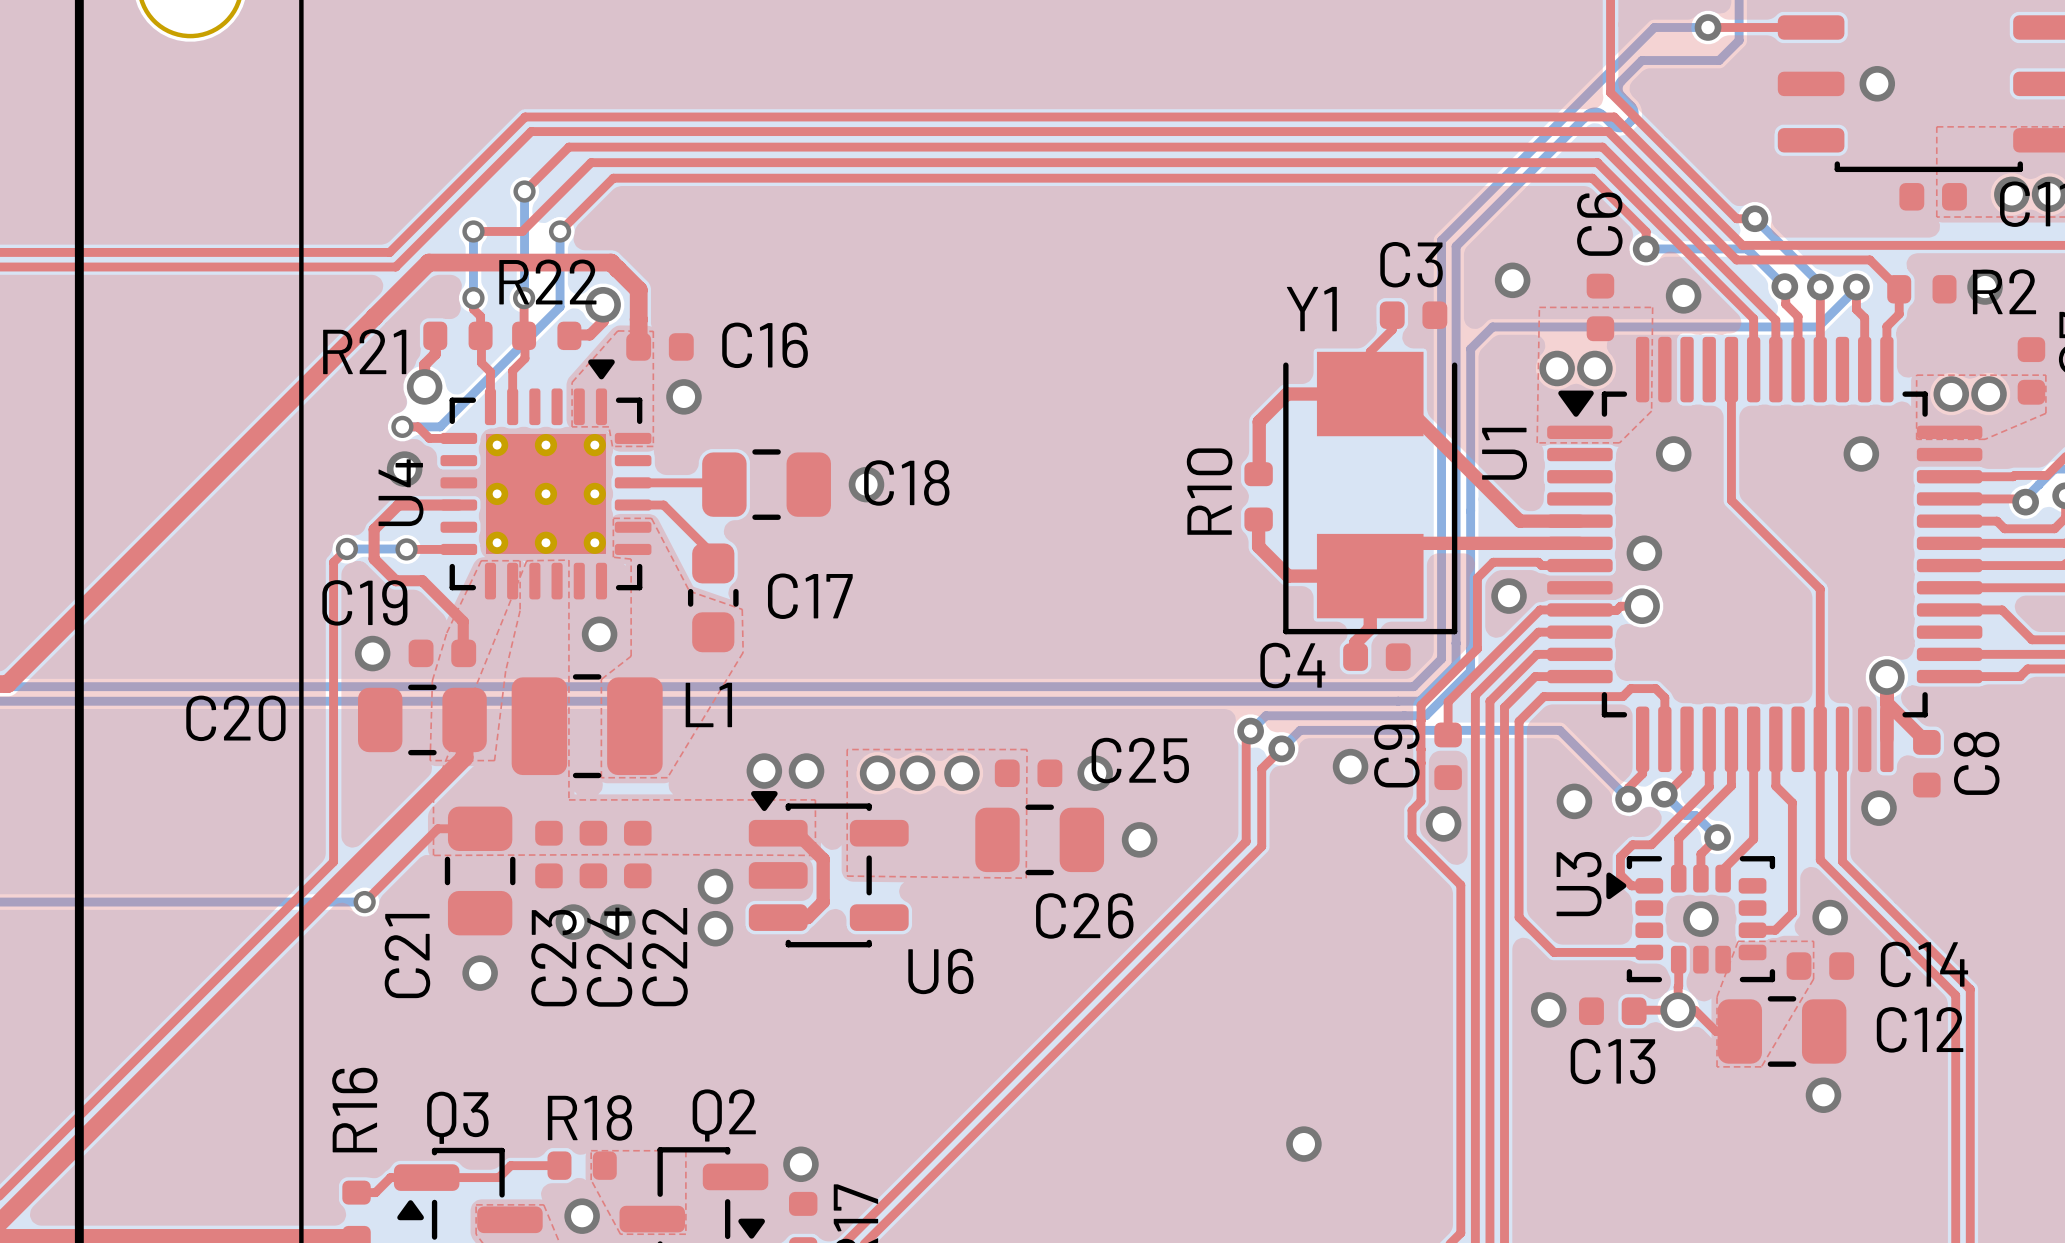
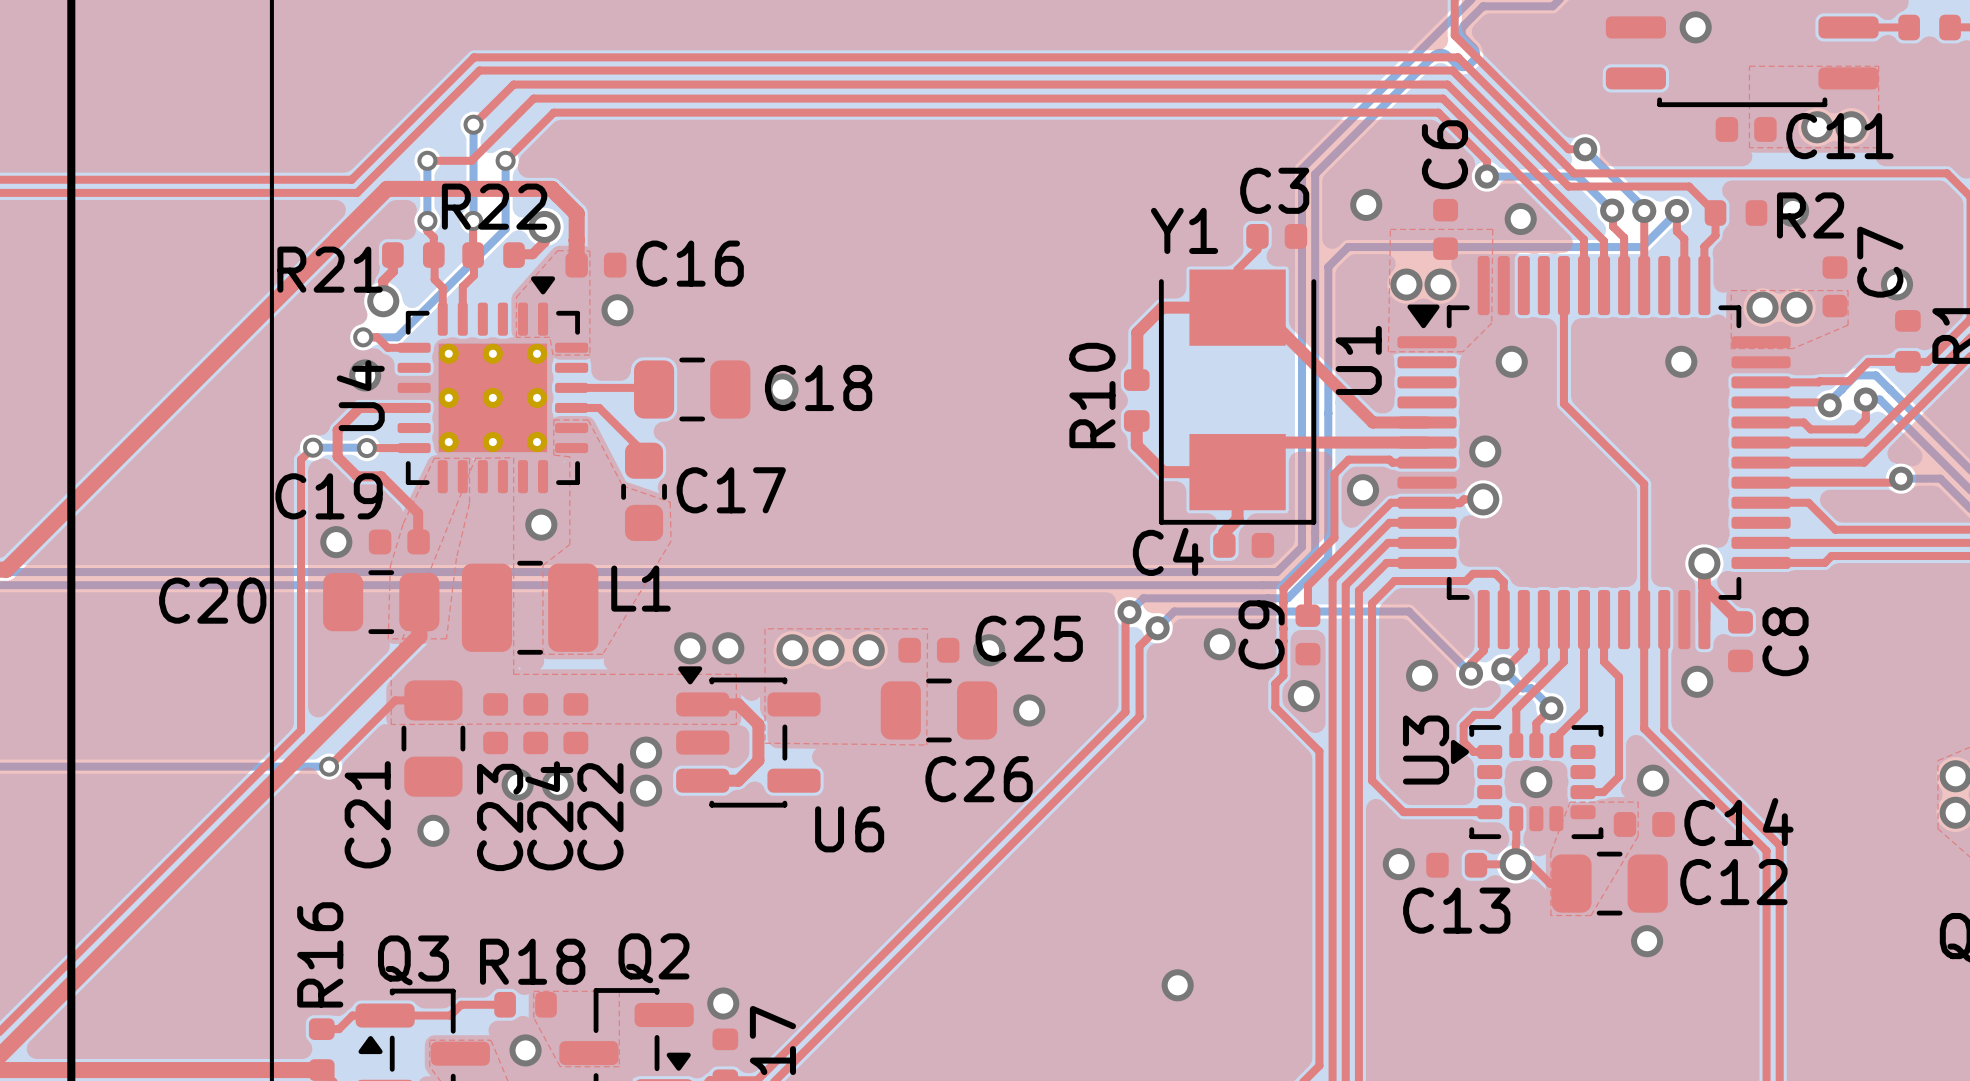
top track: (797, 833) (823, 859) (823, 902) (807, 917) -> (719, 704) (738, 704) (758, 724) (758, 760) (738, 780) (729, 780)

